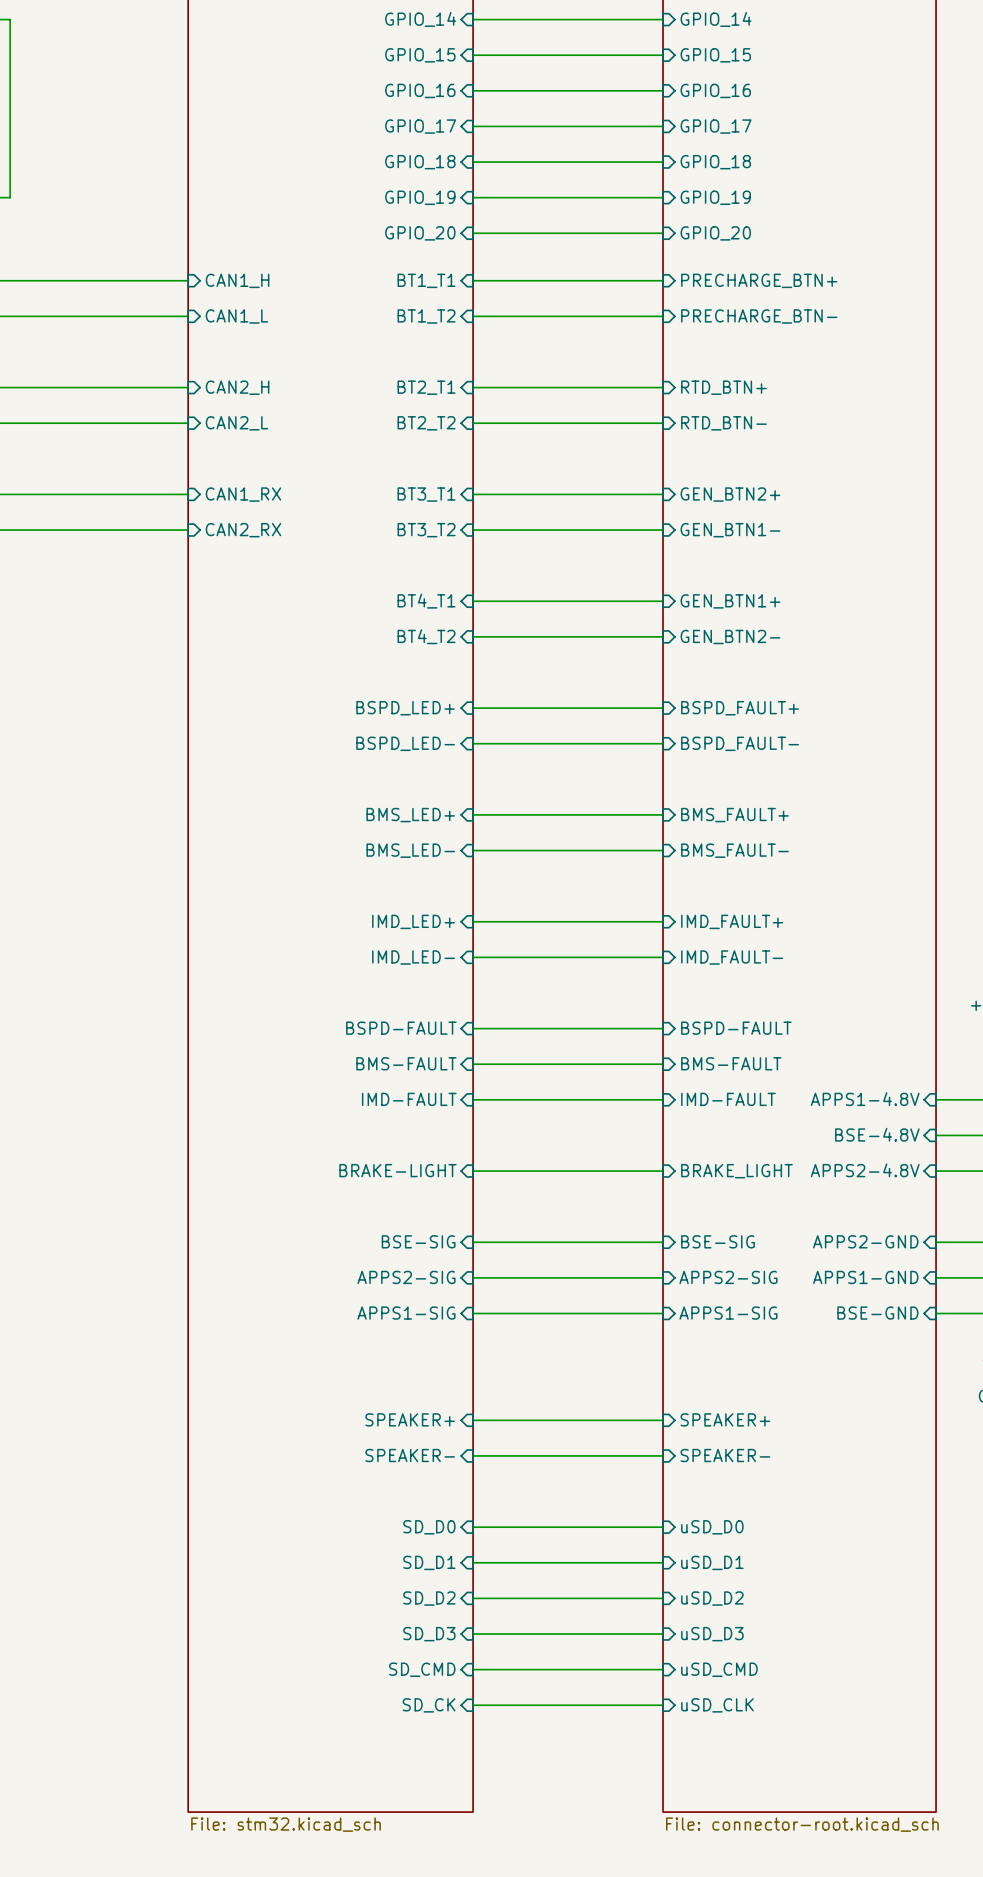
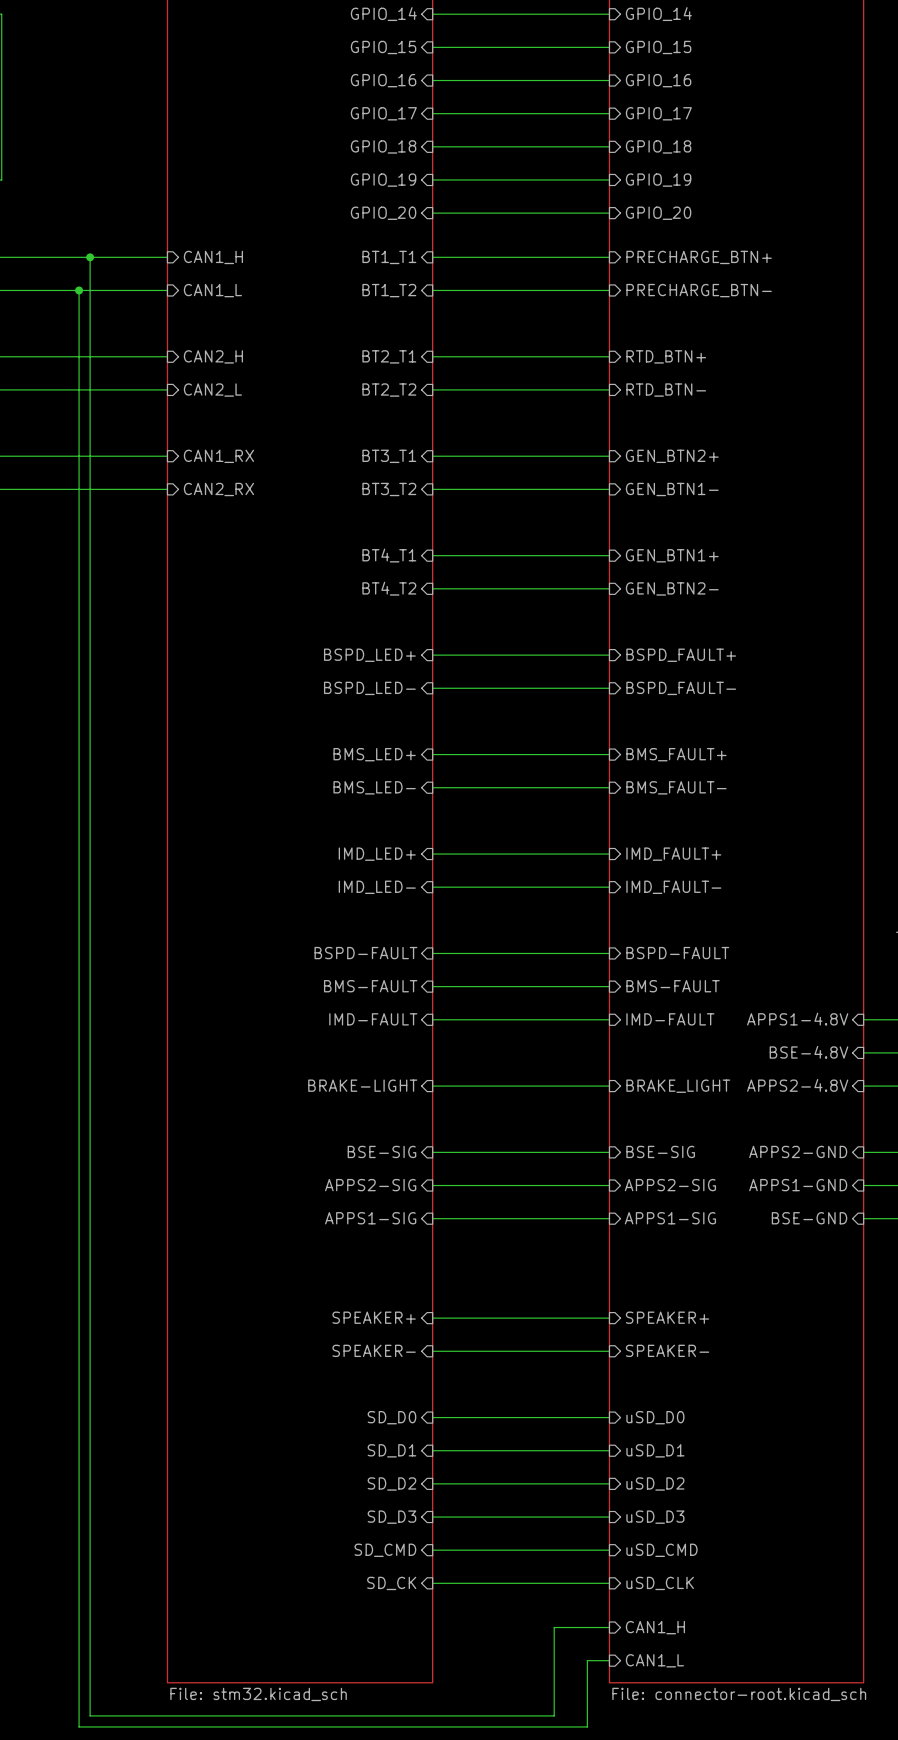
wire: none -> (90, 257) (90, 1715) (554, 1715) (554, 1627) (609, 1627)
junction: none -> (90, 257)
wire: none -> (79, 290) (79, 1726) (587, 1726) (587, 1660) (609, 1660)
junction: none -> (79, 290)
sheet pin: none -> CAN1_H (655, 1627)
sheet pin: none -> CAN1_L (654, 1660)

